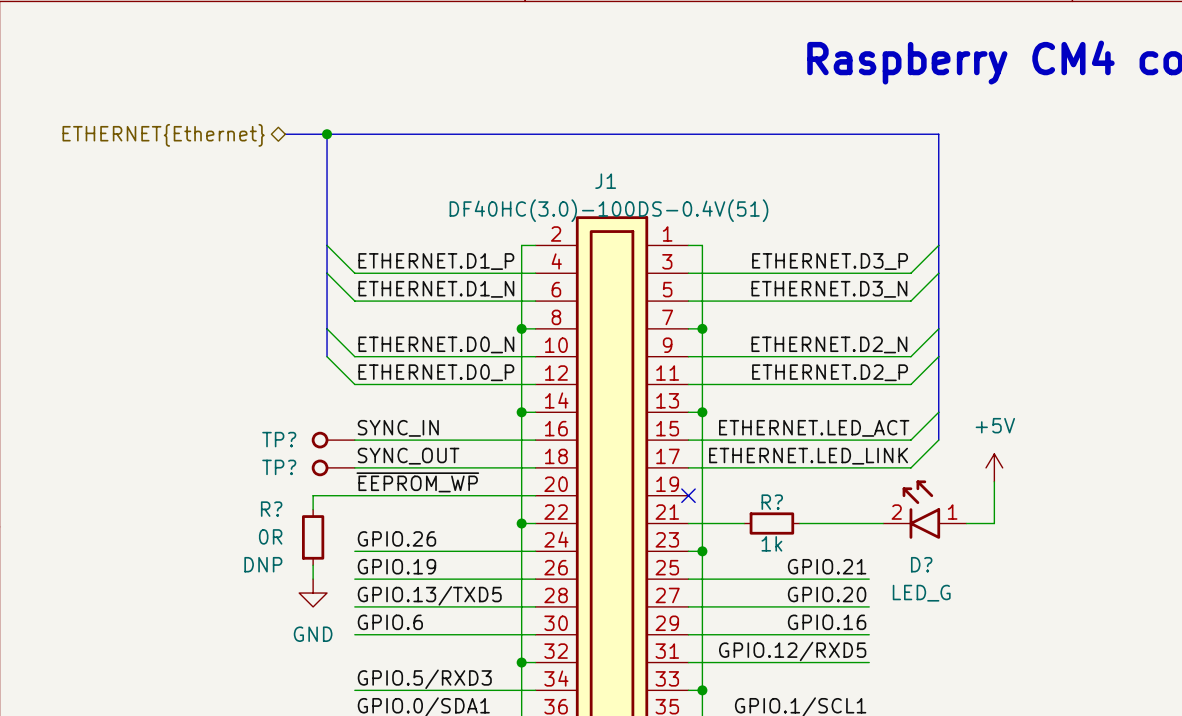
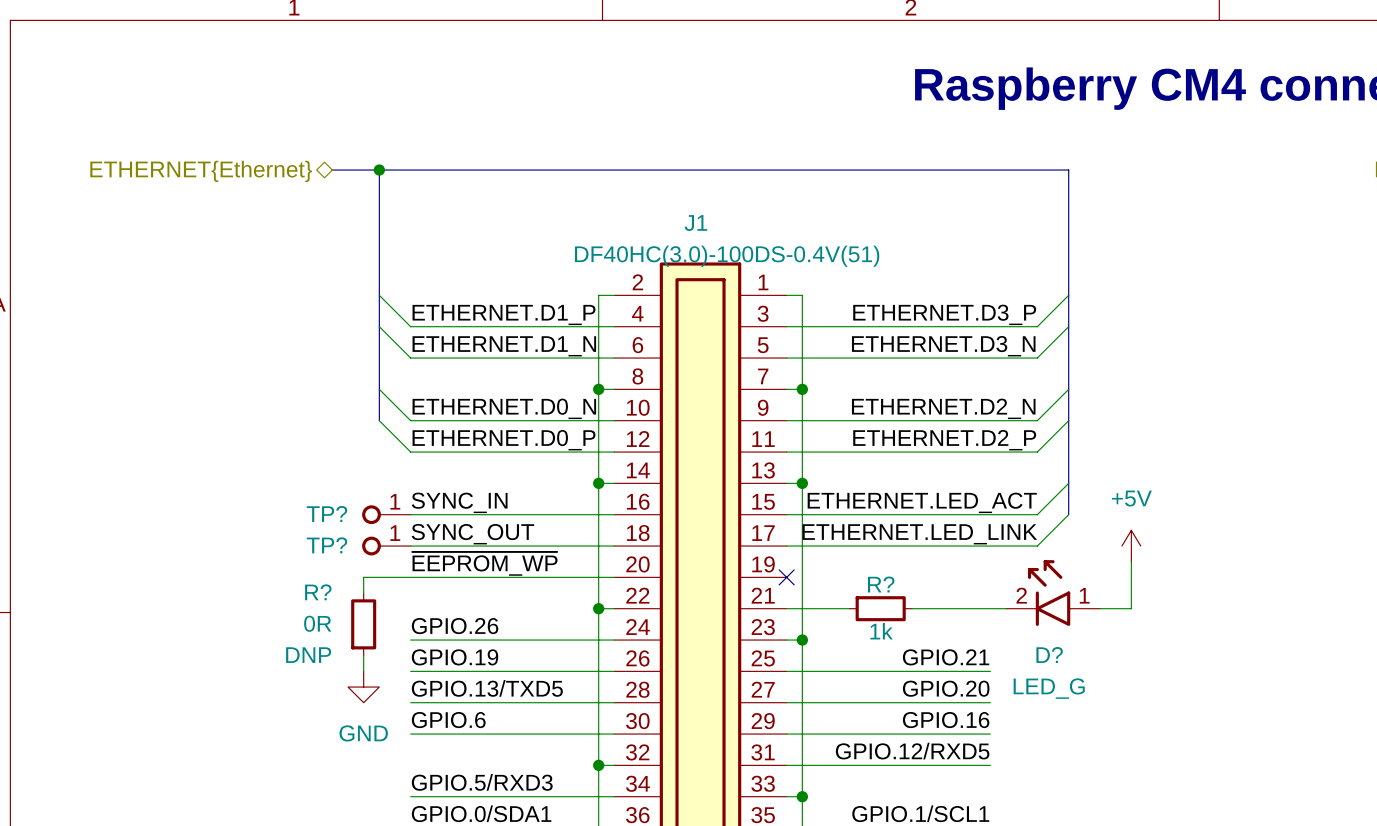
TP? pin number: none -> 1 (395, 501)
TP? pin number: none -> 1 (395, 533)

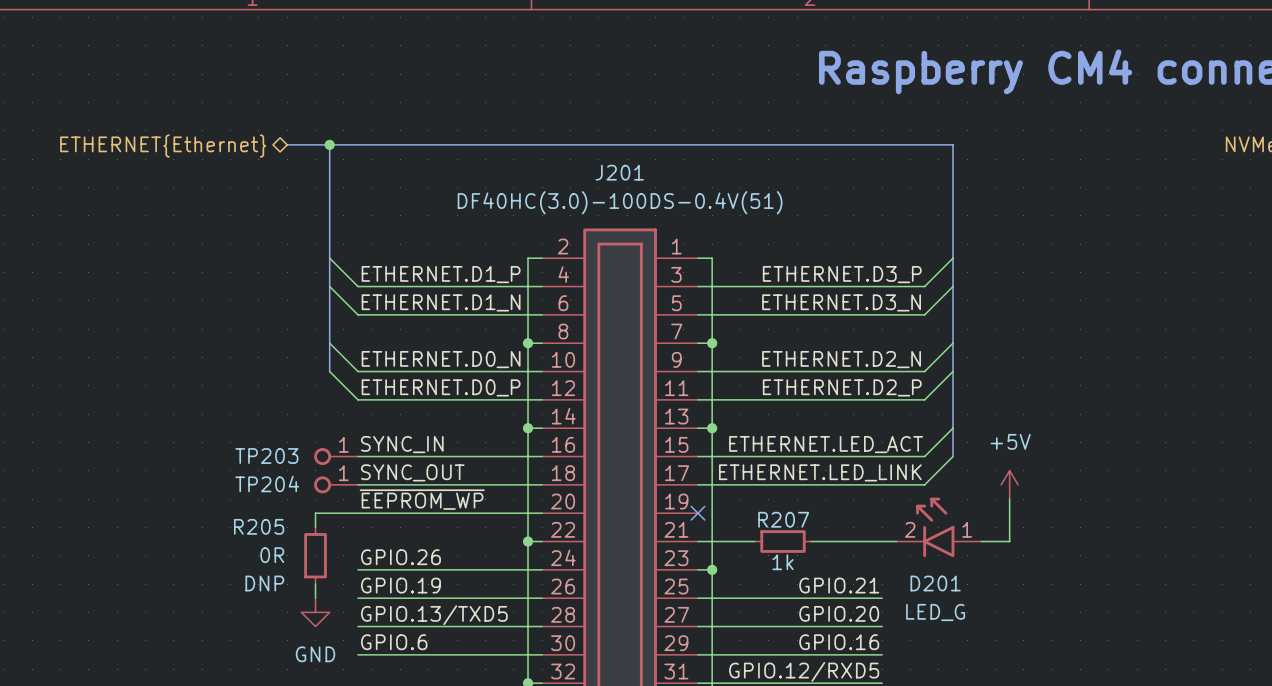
J1 name: J1 (695, 223) -> J201 (619, 172)
J1 text position: DF40HC(3.0)-100DS-0.4V(51) (727, 256) -> DF40HC(3.0)-100DS-0.4V(51) (620, 202)
TP? name: TP? (326, 513) -> TP203 (266, 456)
TP? name: TP? (326, 545) -> TP204 (267, 484)
R? name: R? (881, 584) -> R207 (783, 519)
R? name: R? (318, 592) -> R205 (259, 526)
D? name: D? (1049, 655) -> D201 (935, 583)

